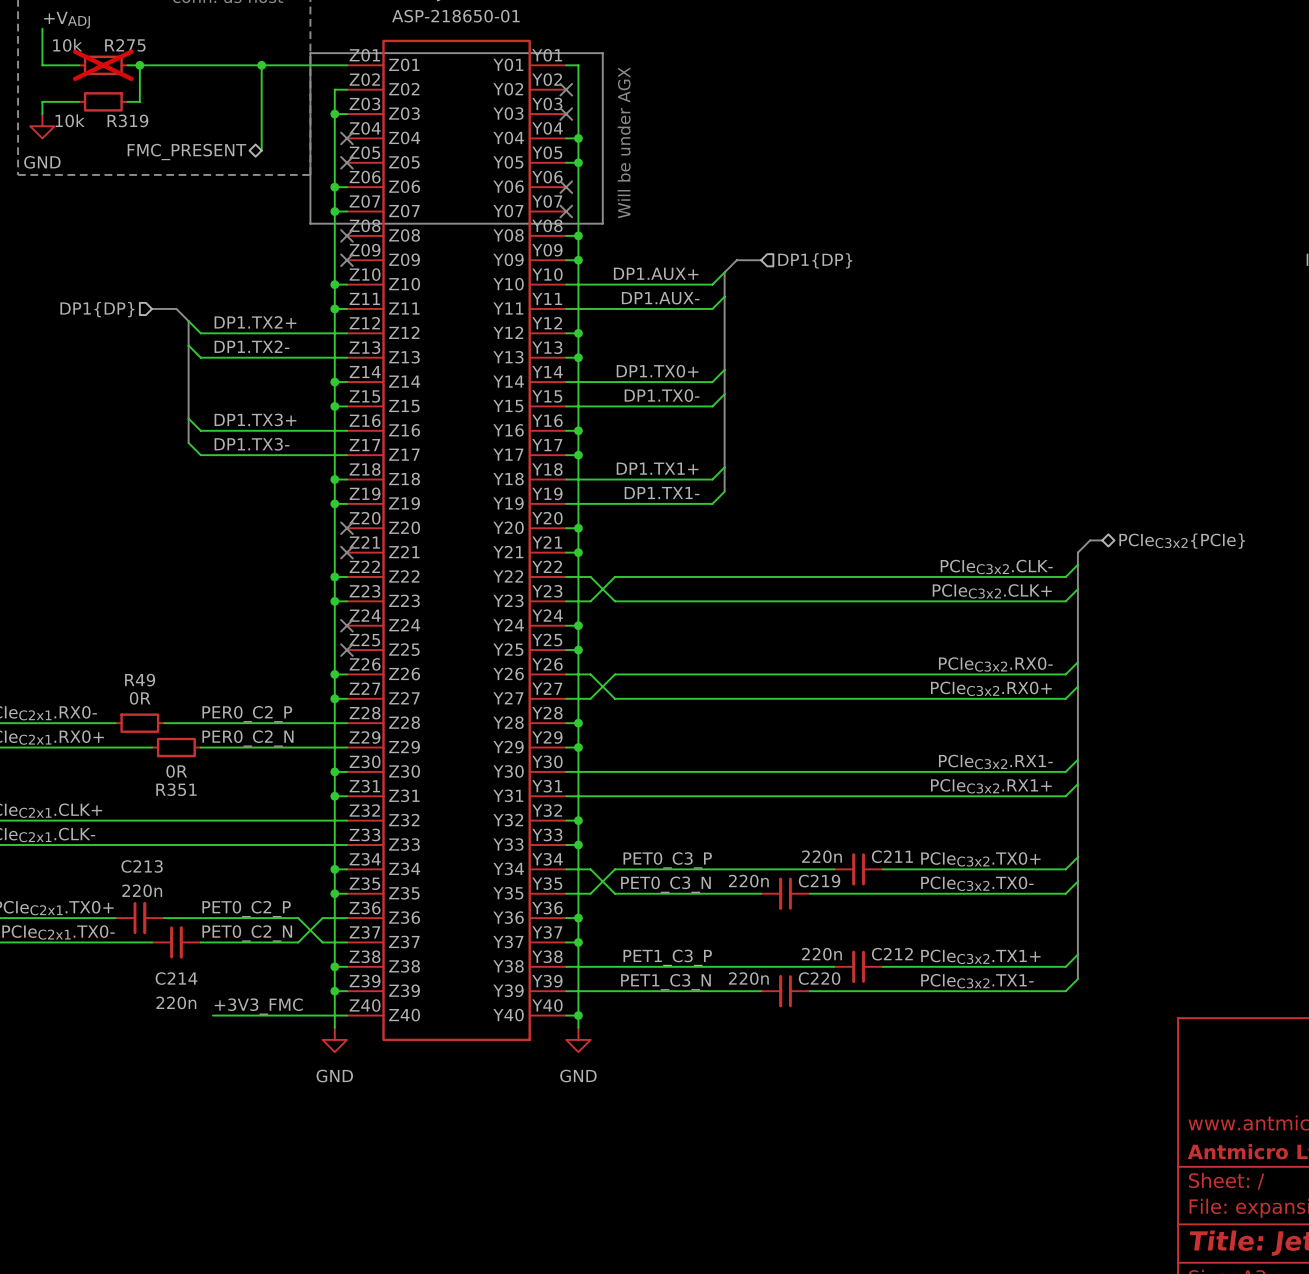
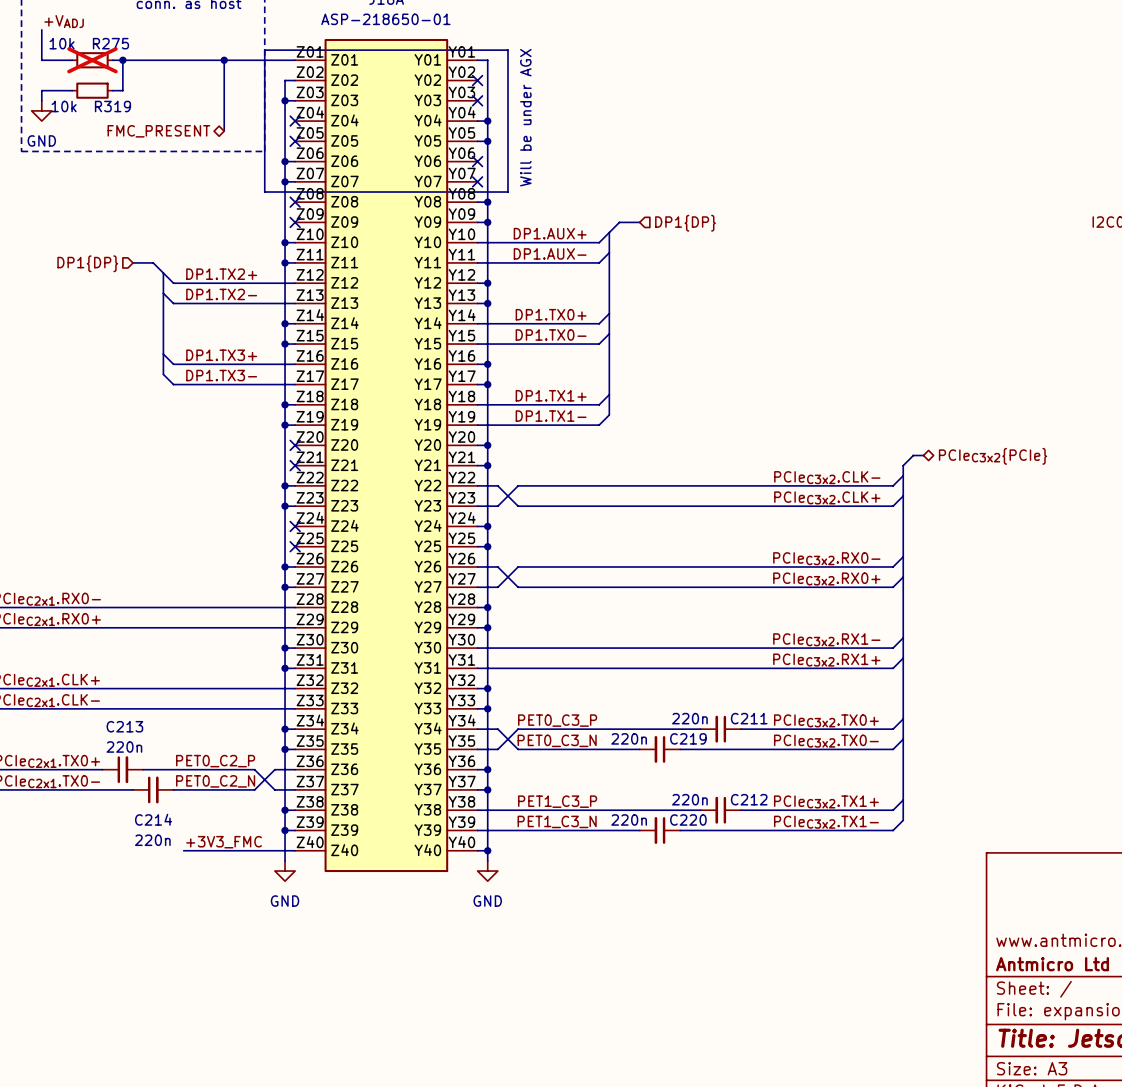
label: PER0_C2_P (247, 714) -> none
wire: none -> (102, 607) (143, 607)
R49: (139, 723) -> none
label: PER0_C2_N (247, 738) -> none
wire: none -> (133, 627) (173, 627)
R351: (176, 747) -> none

